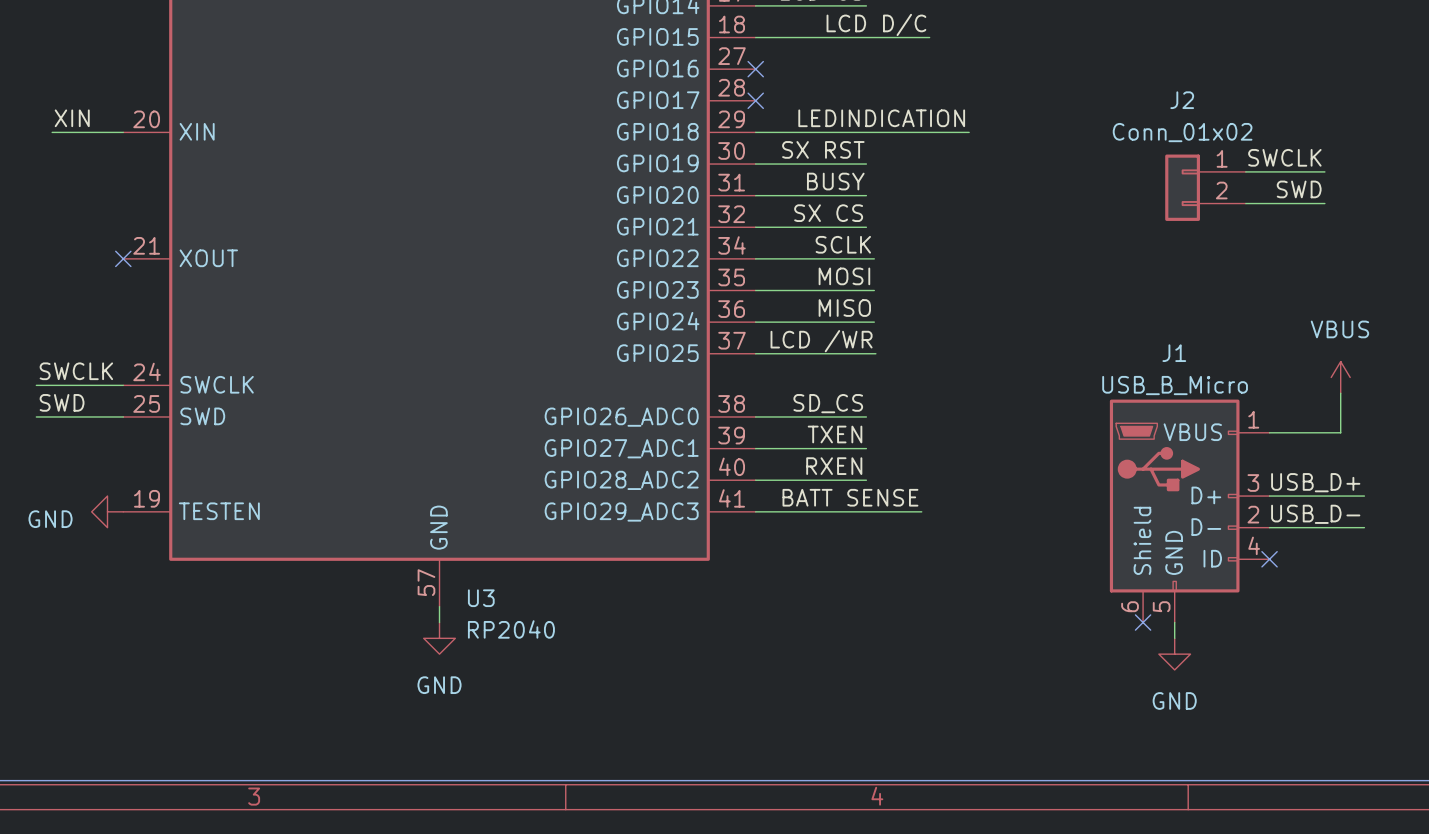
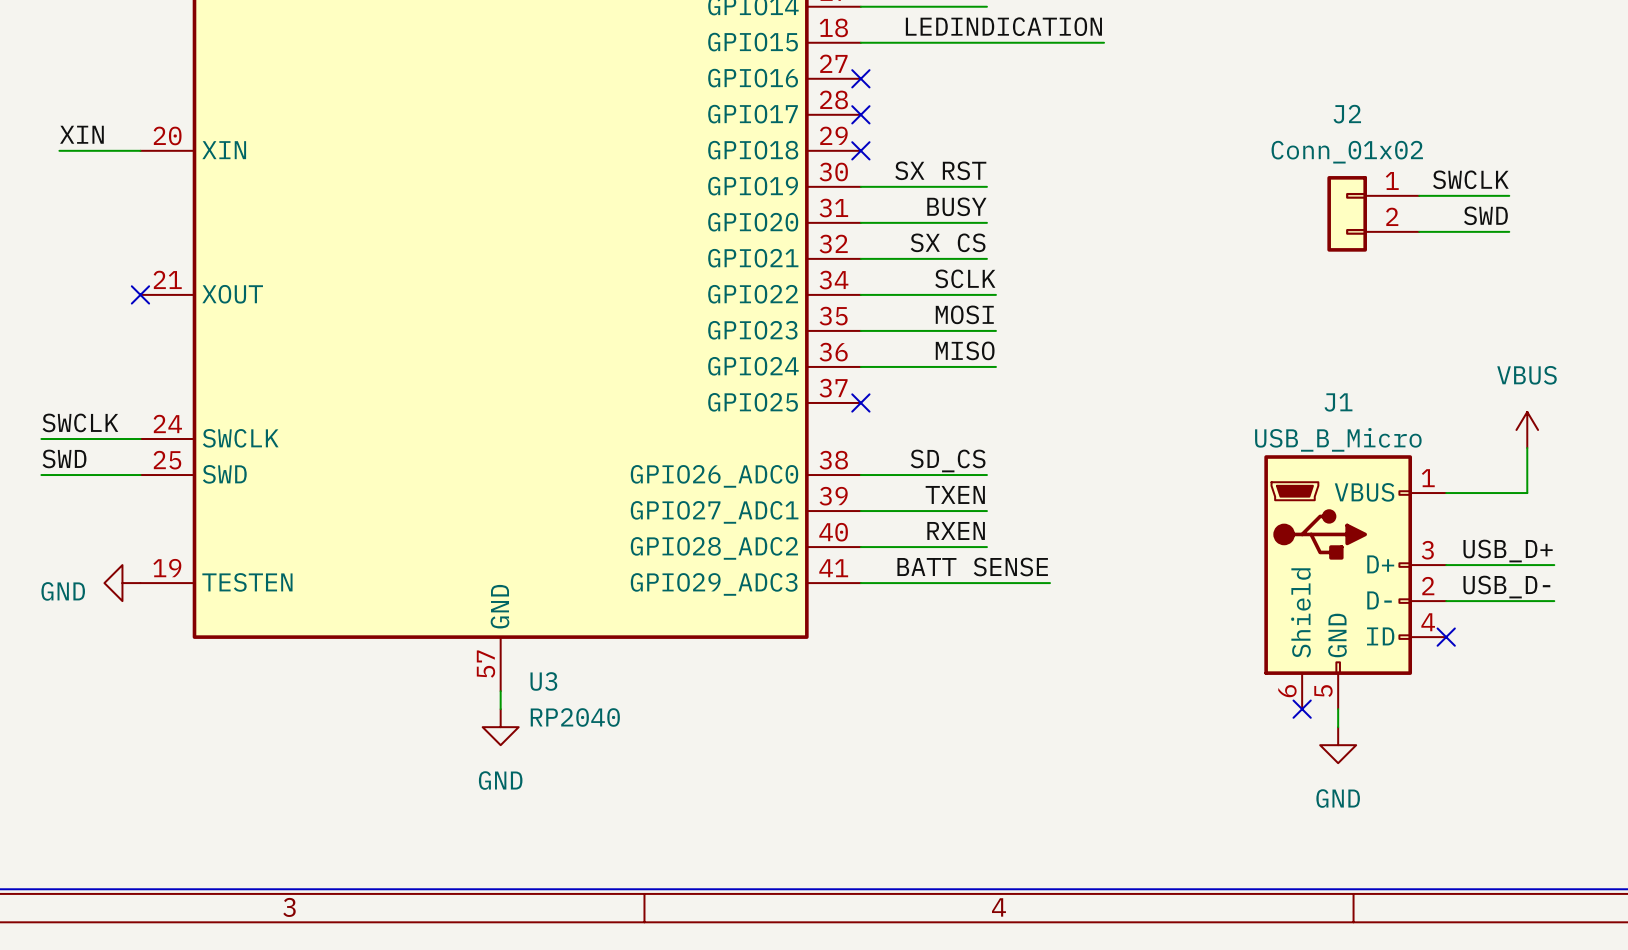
label: LCD D/C (876, 24) -> none
wire: none -> (1059, 42) (1104, 42)
label position: LEDINDICATION (881, 118) -> LEDINDICATION (1003, 26)
wire: (755, 132) (969, 132) -> none
no-connect mark: none -> (860, 150)
label: LCD /WR (821, 341) -> none
wire: (755, 353) (875, 353) -> none
no-connect mark: none -> (860, 402)

